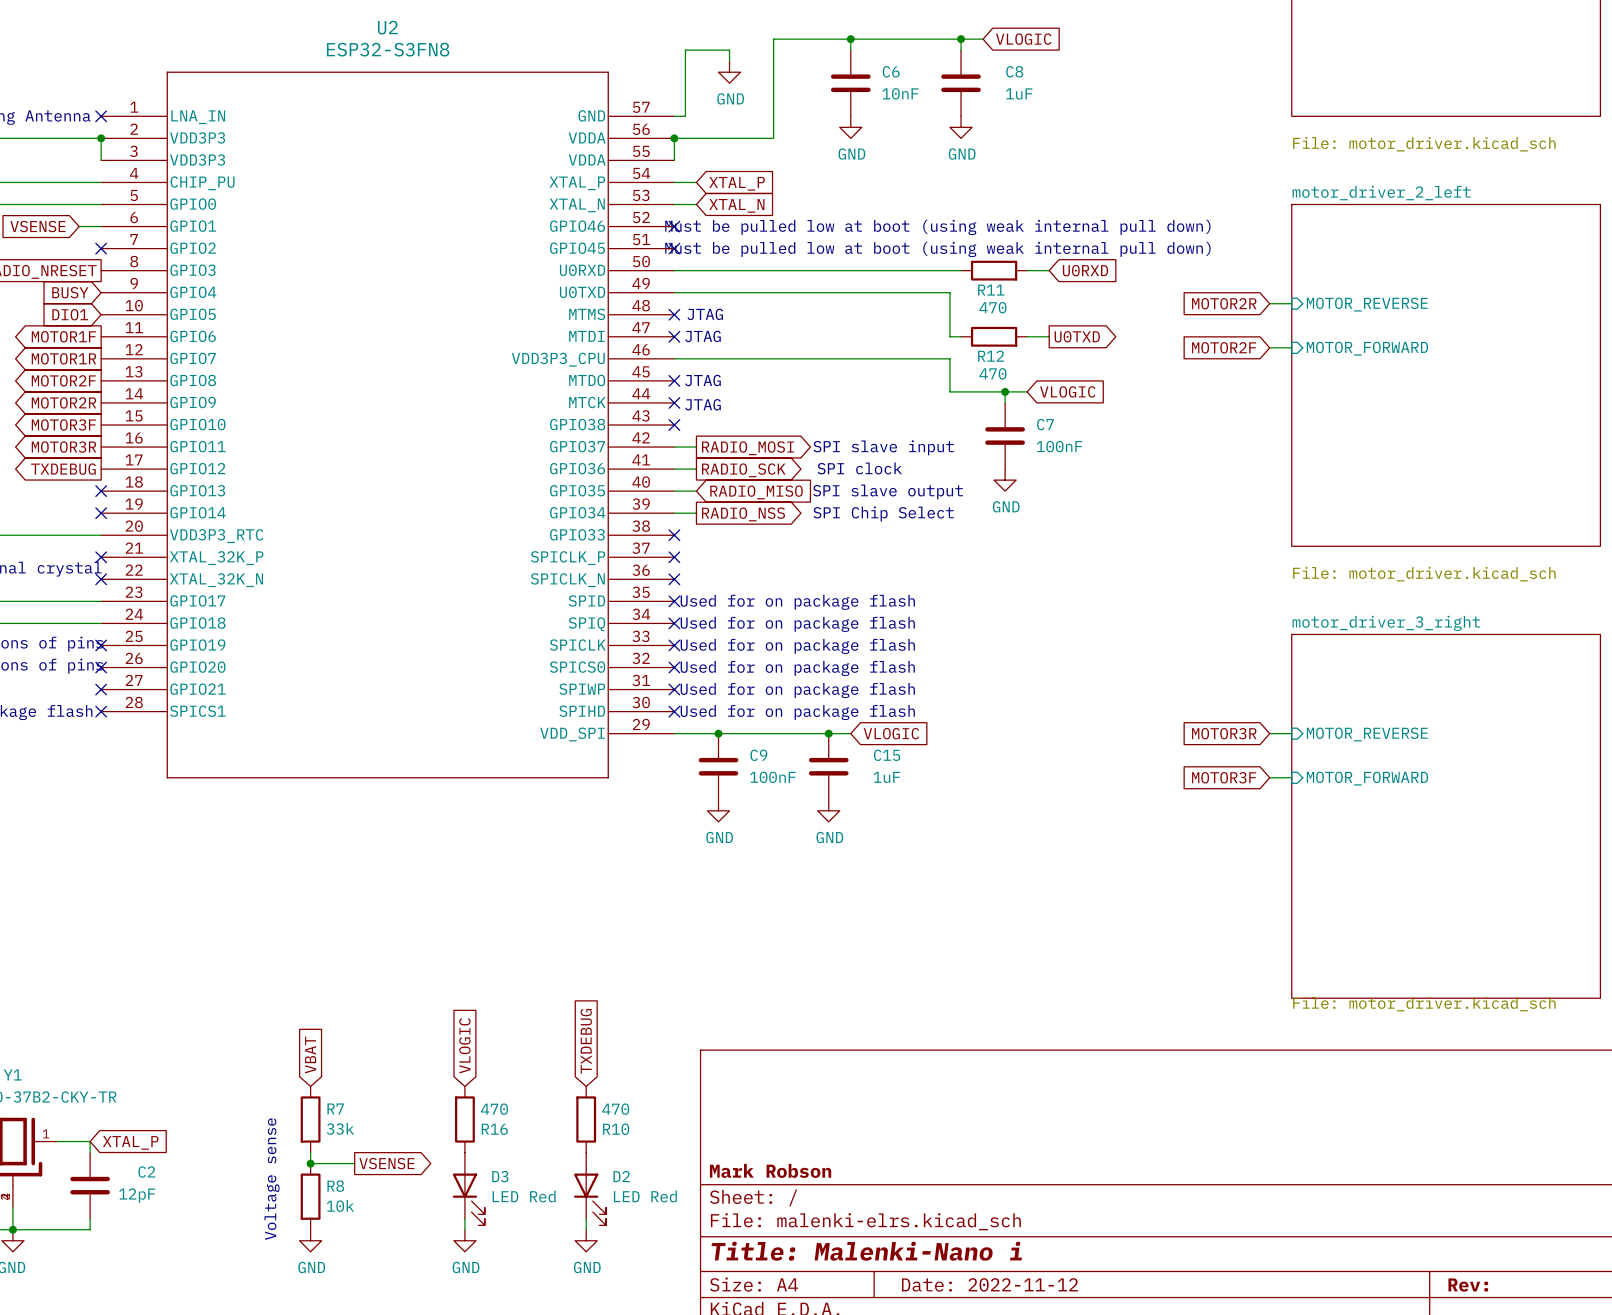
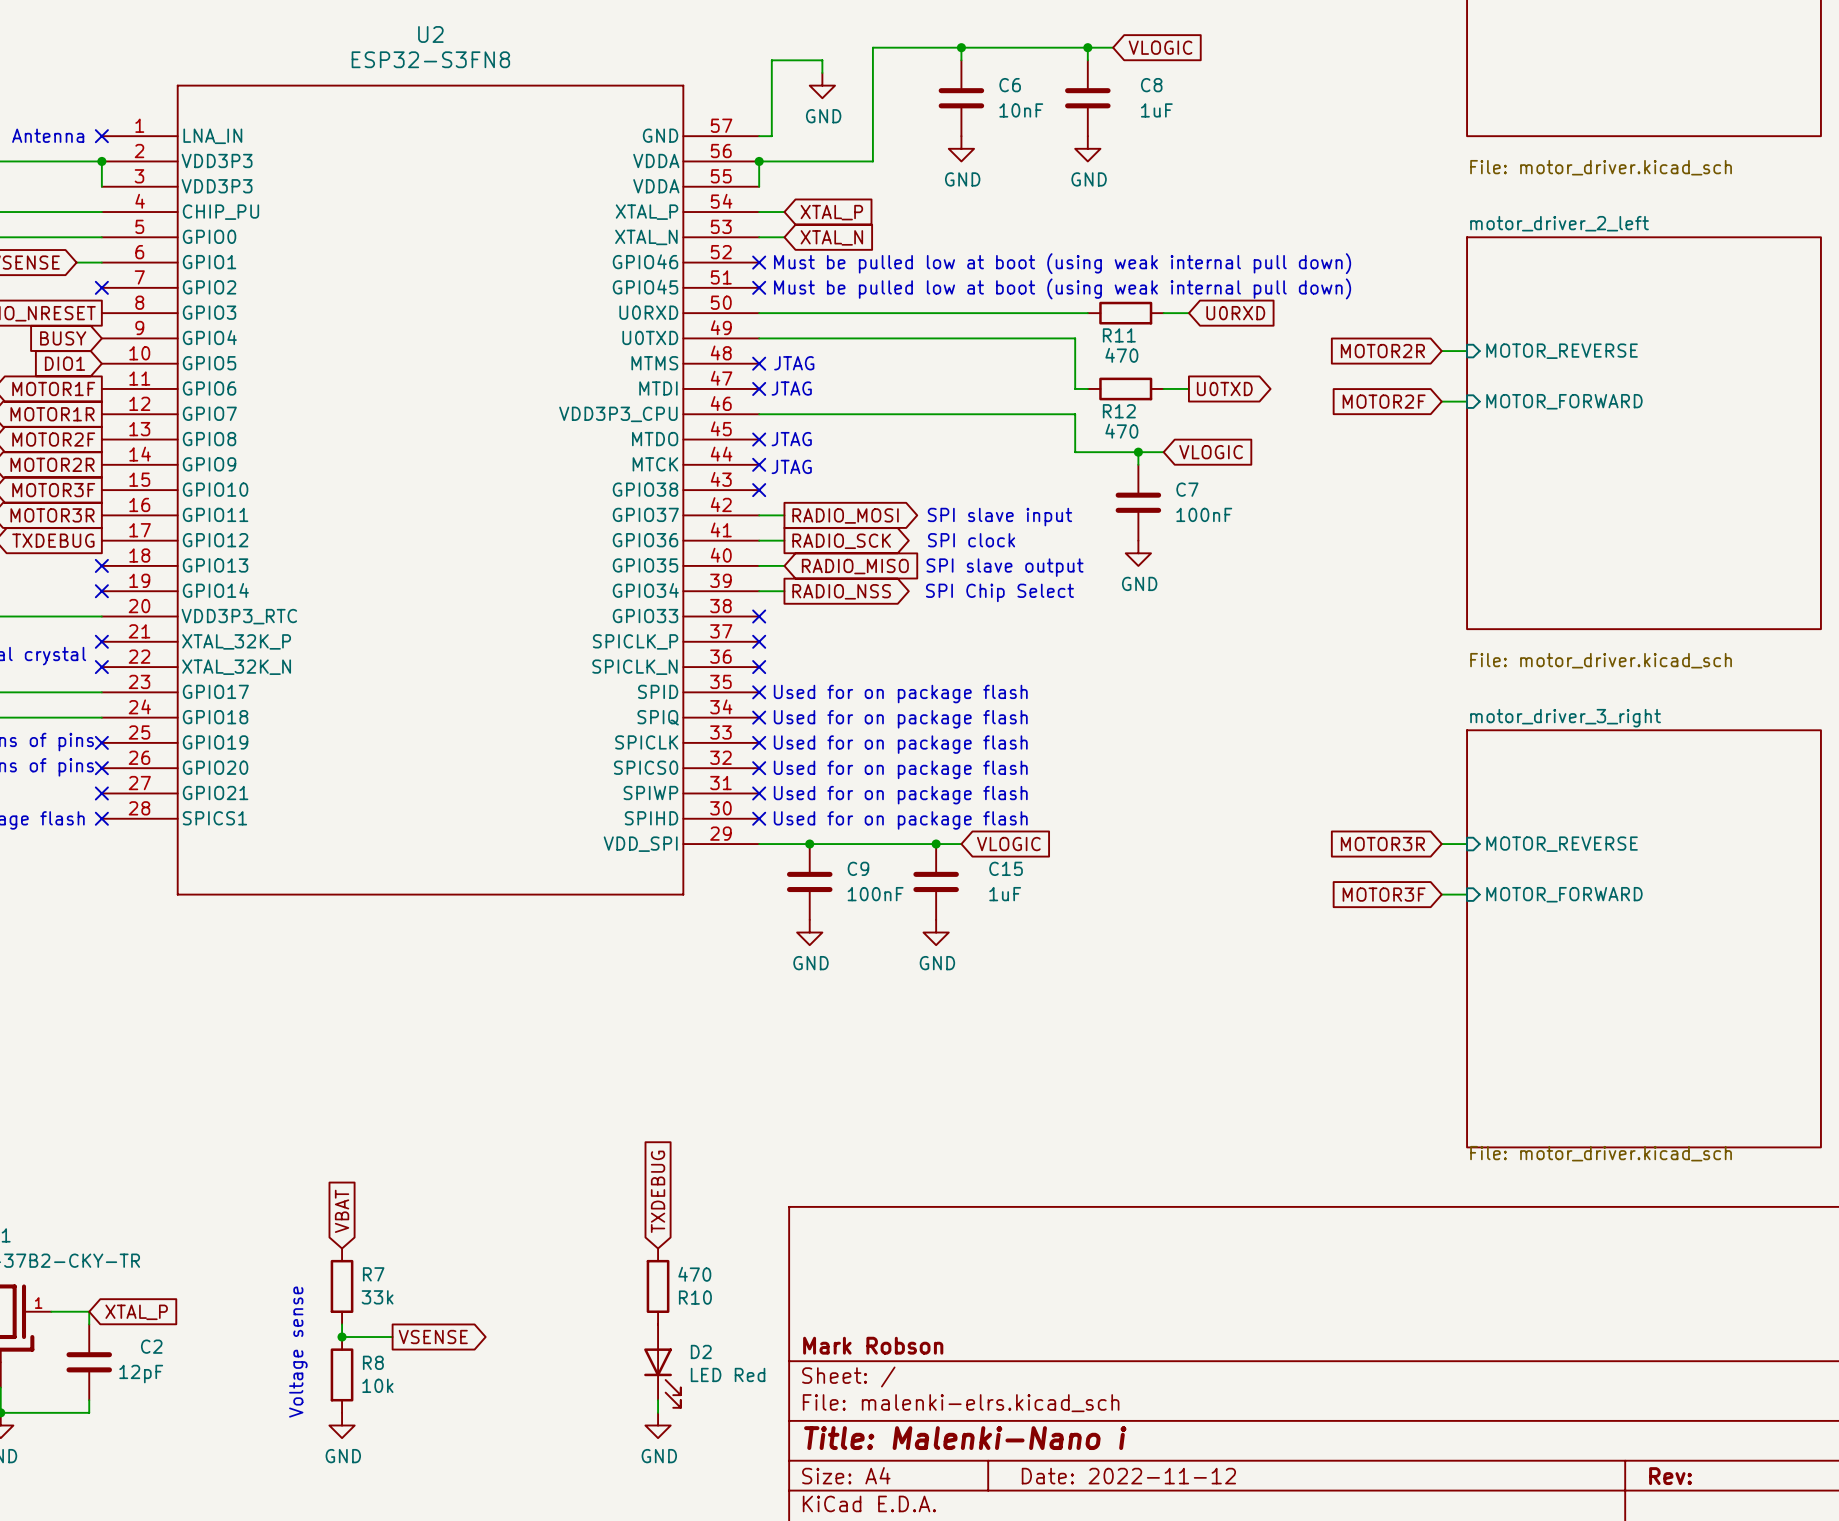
global label: VLOGIC (464, 1045) -> none
R16: 470 (464, 1119) -> none
D3: LED Red (468, 1188) -> none
wire: (464, 1218) (464, 1229) -> none
power symbol: GND (464, 1240) -> none

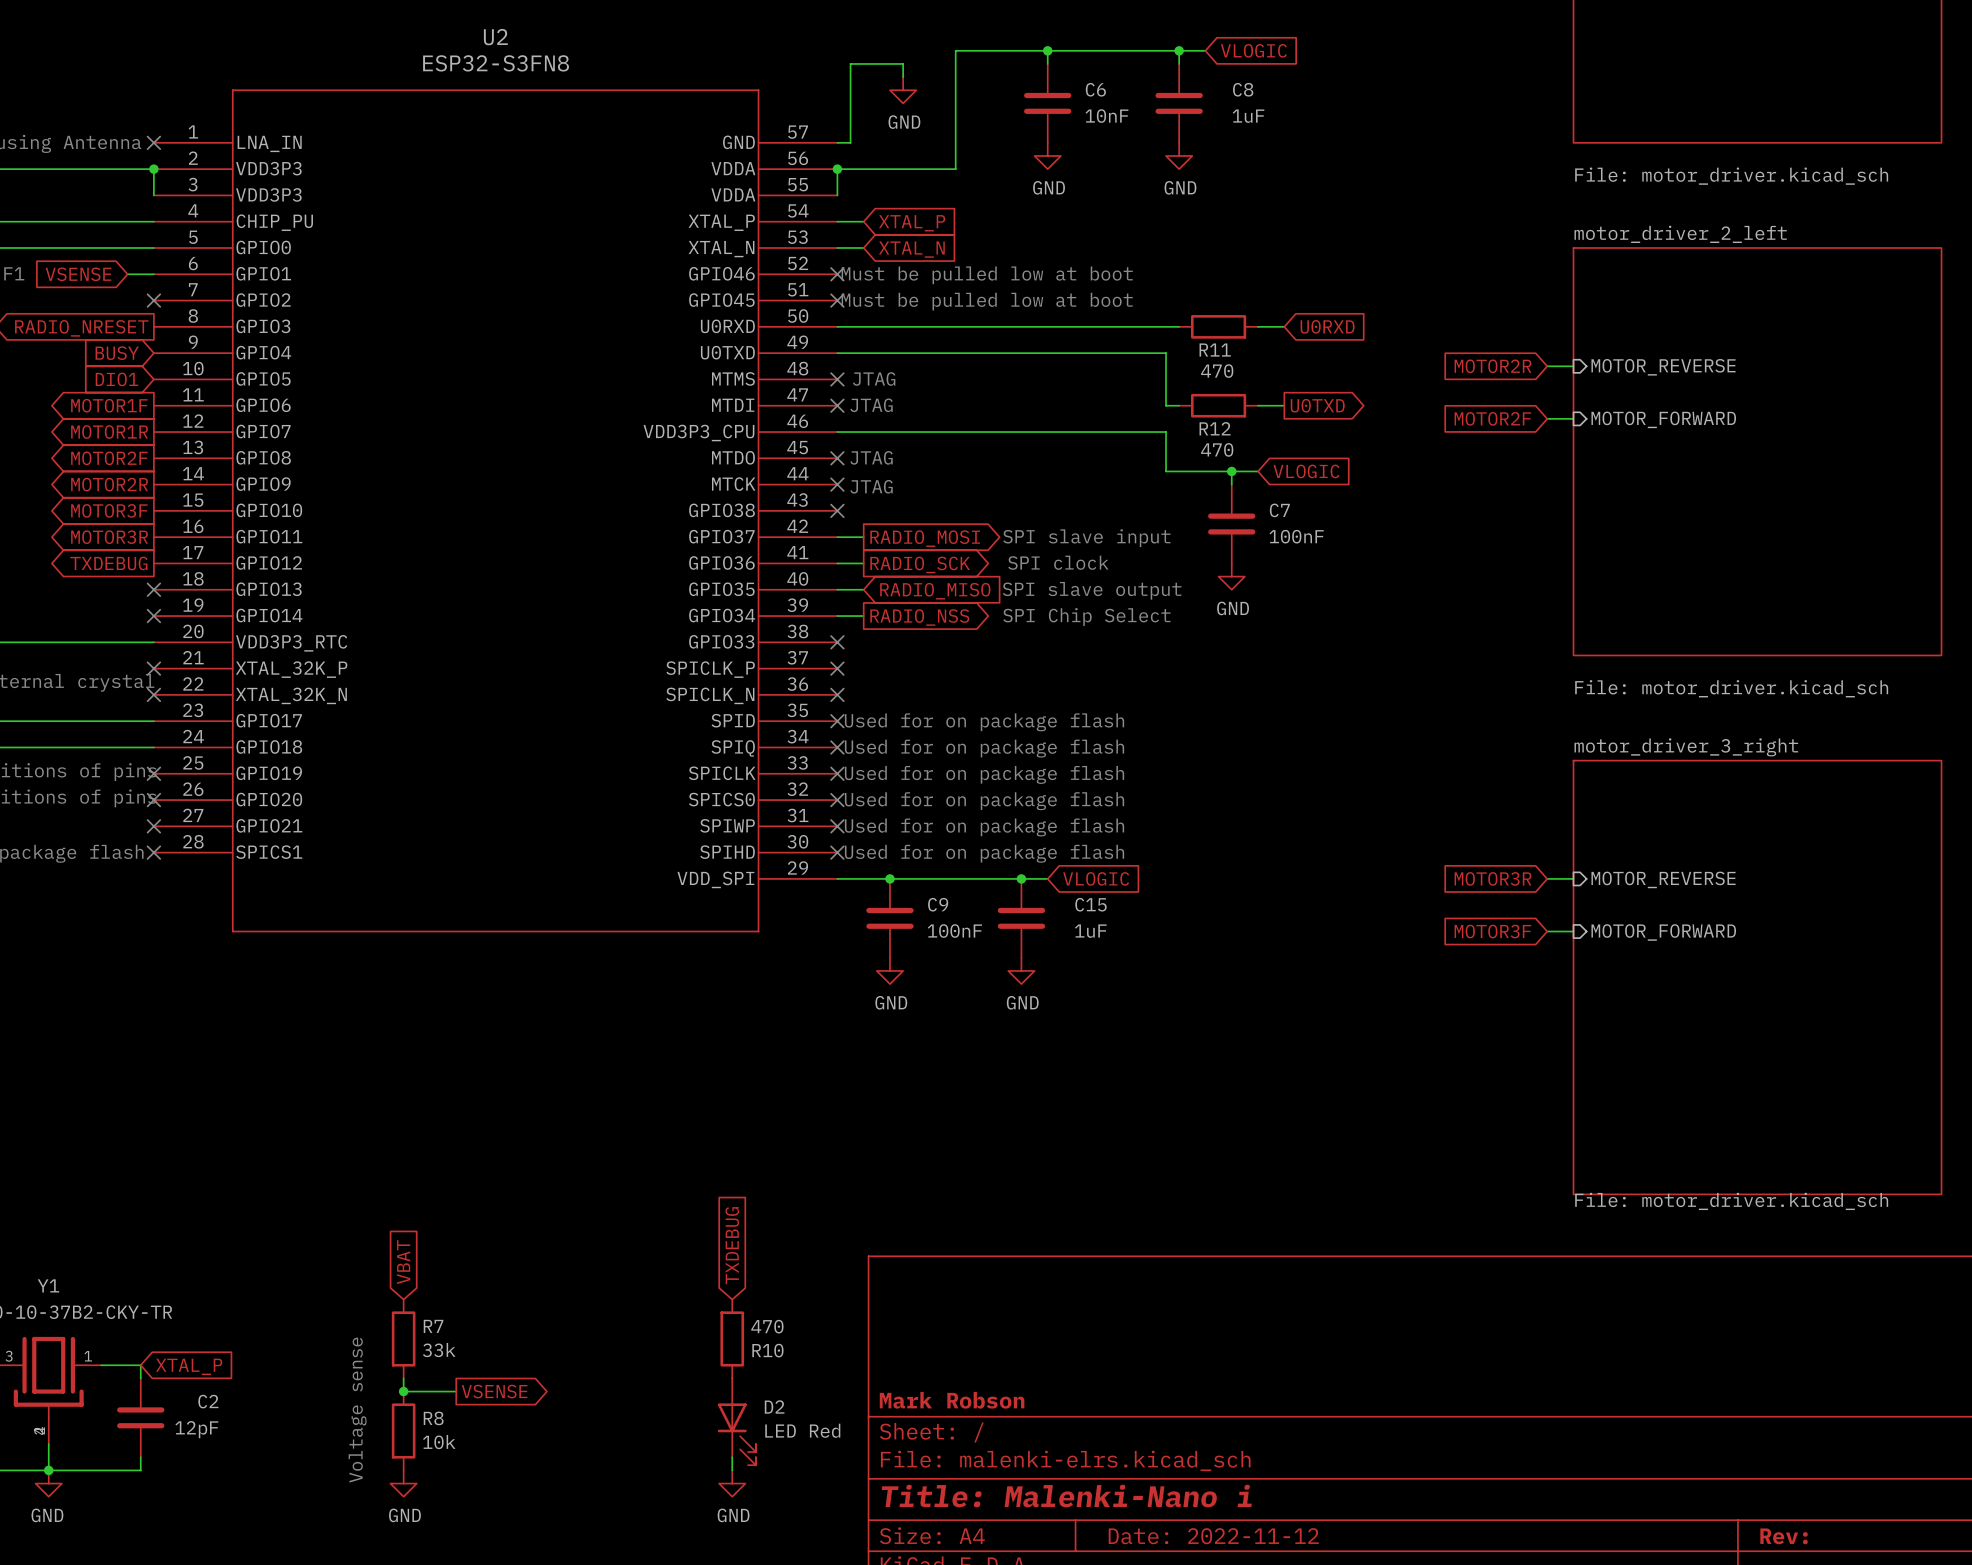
text: Must be pulled low at boot (using weak internal pull down) (1062, 263) -> none
text: none -> Must be pulled low at boot (987, 275)
text: Must be pulled low at boot (using weak internal pull down) (1062, 288) -> none
text: none -> Must be pulled low at boot (987, 301)

